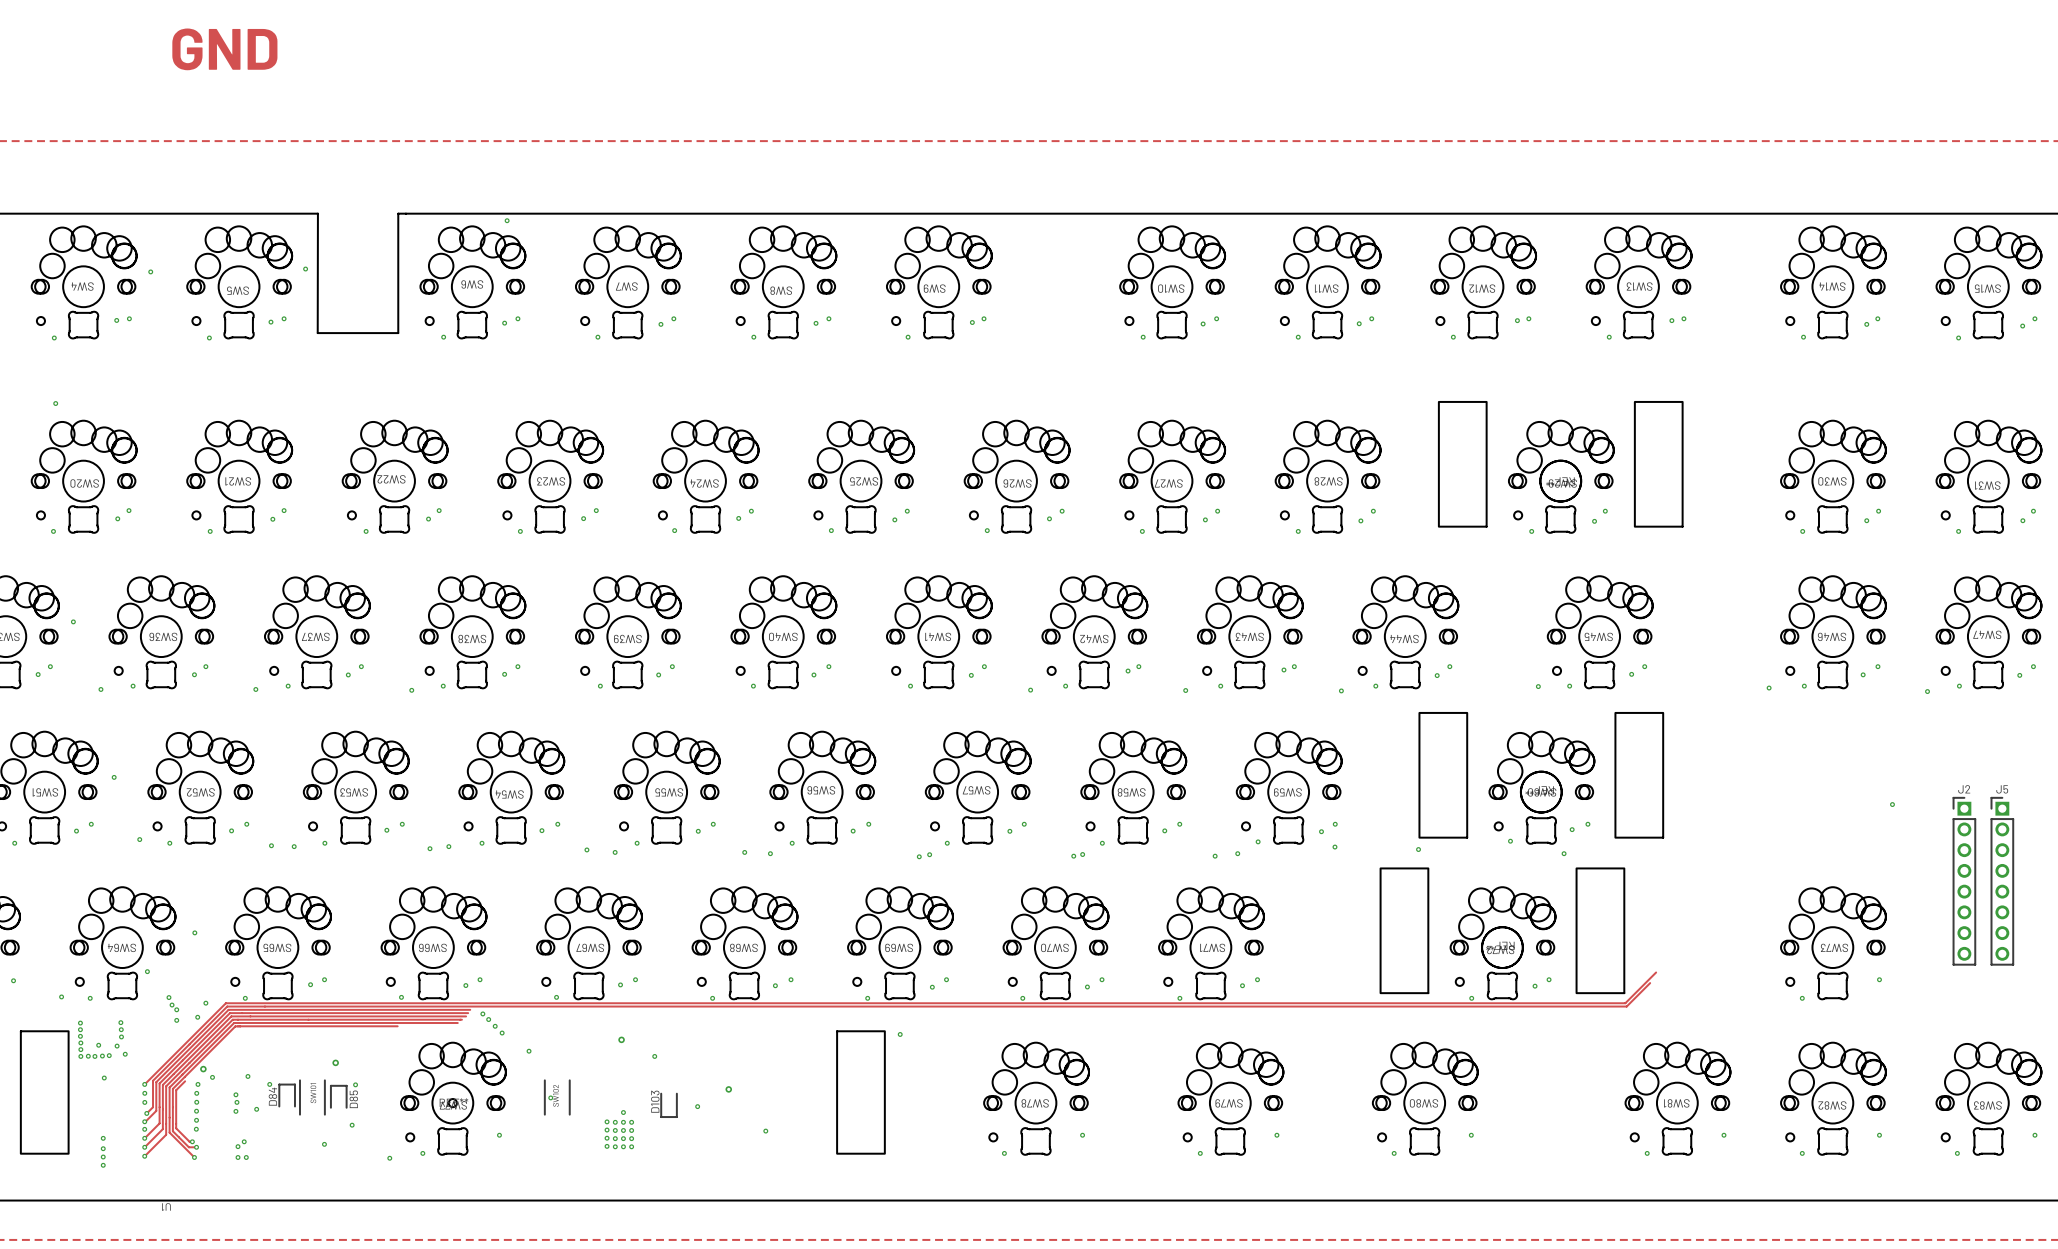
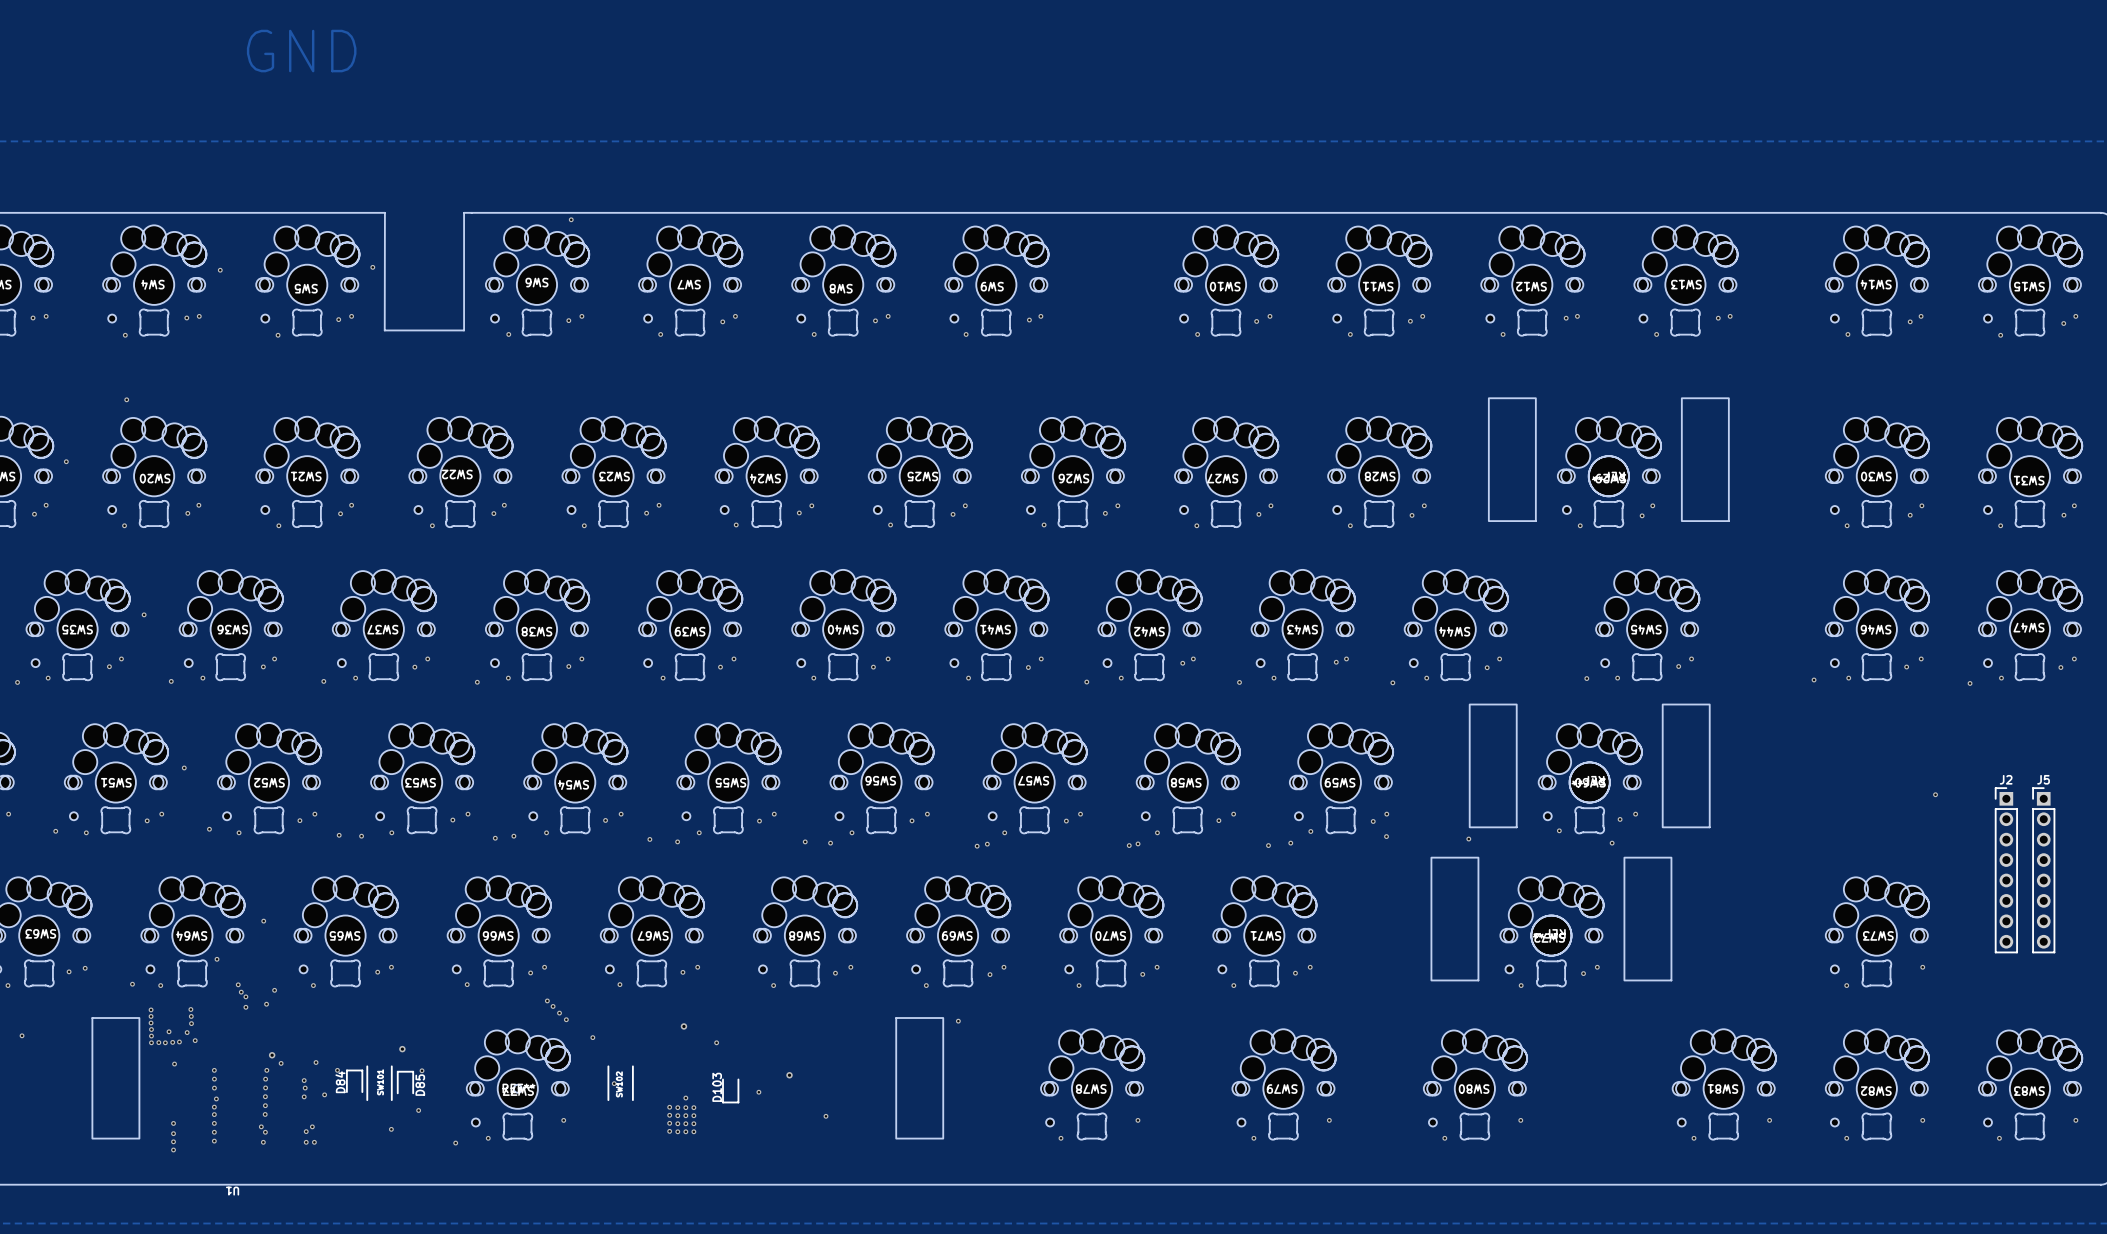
track: (1656, 972) (1625, 1003) (225, 1003) (144, 1084) -> none
track: (1650, 983) (1626, 1006) (227, 1006) (153, 1080) (153, 1107) (146, 1113) -> none
track: (470, 1009) (228, 1009) (156, 1082) (156, 1110) (145, 1121) -> none
track: (468, 1013) (229, 1013) (159, 1083) (159, 1123) (144, 1138) -> none
track: (466, 1016) (231, 1016) (162, 1084) (162, 1129) (144, 1147) -> none
track: (461, 1019) (232, 1019) (166, 1086) (166, 1134) (144, 1156) -> none
track: (457, 1022) (234, 1022) (169, 1087) (169, 1132) (194, 1157) -> none
track: (240, 1026) (397, 1026) -> none
track: (240, 1026) (235, 1026) (172, 1088) (172, 1131) (188, 1147) (196, 1147) -> none
track: (185, 1081) (176, 1090) (176, 1128) (189, 1141) (192, 1141) -> none

